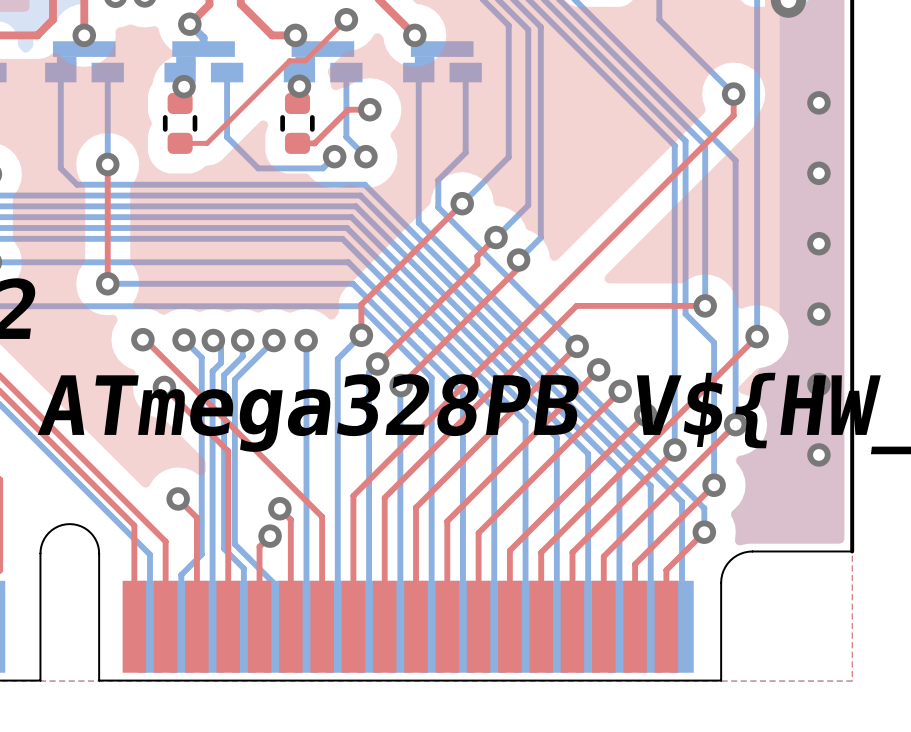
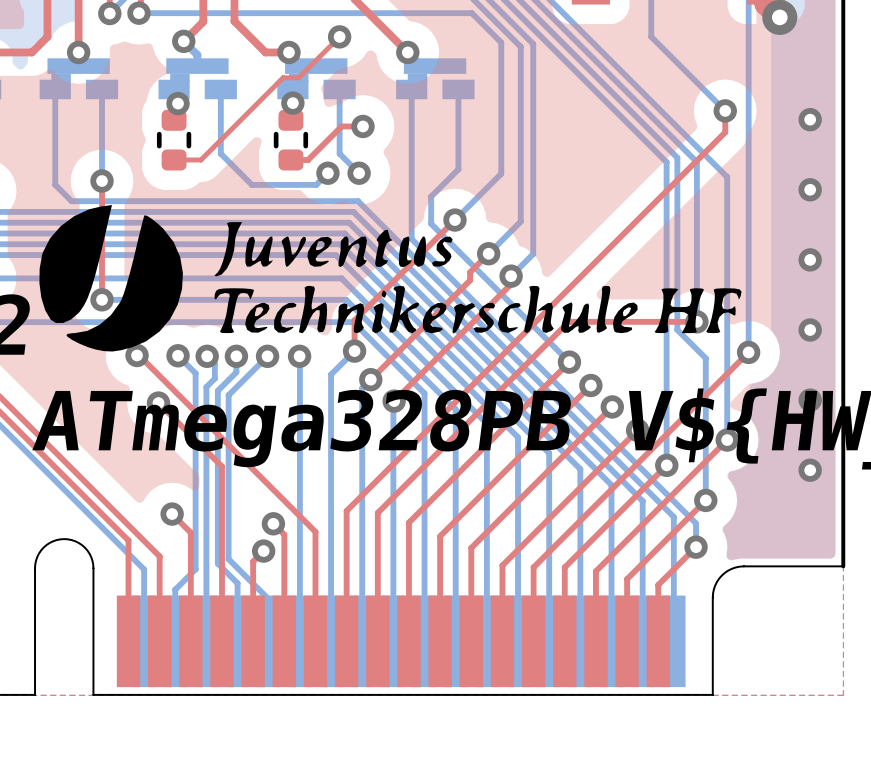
drawing: none -> [39, 205, 742, 352]

